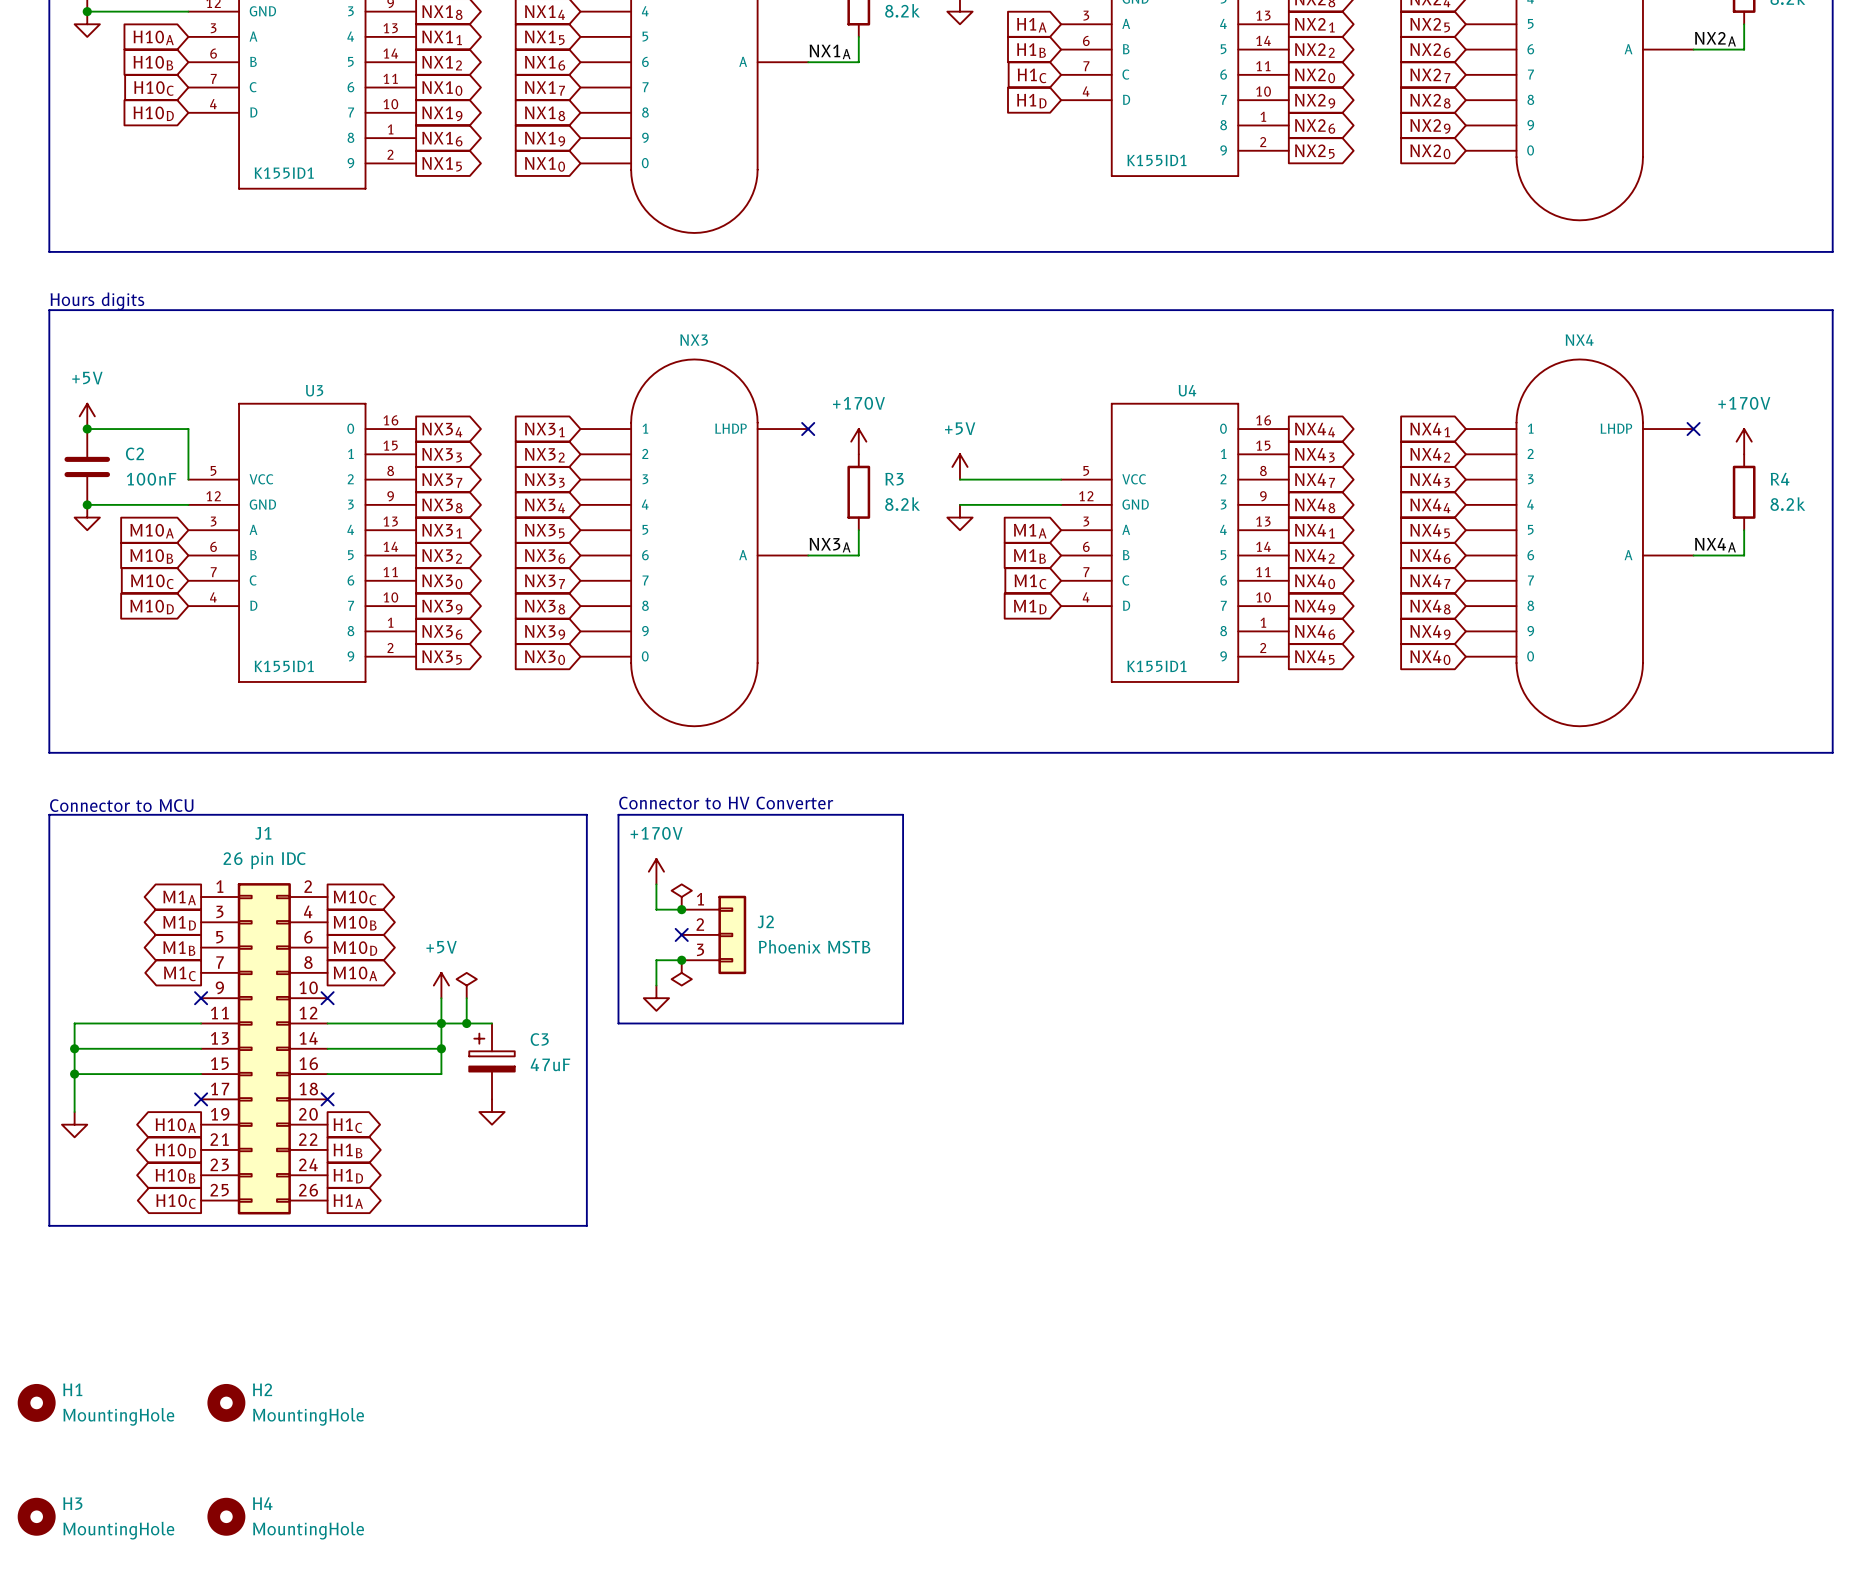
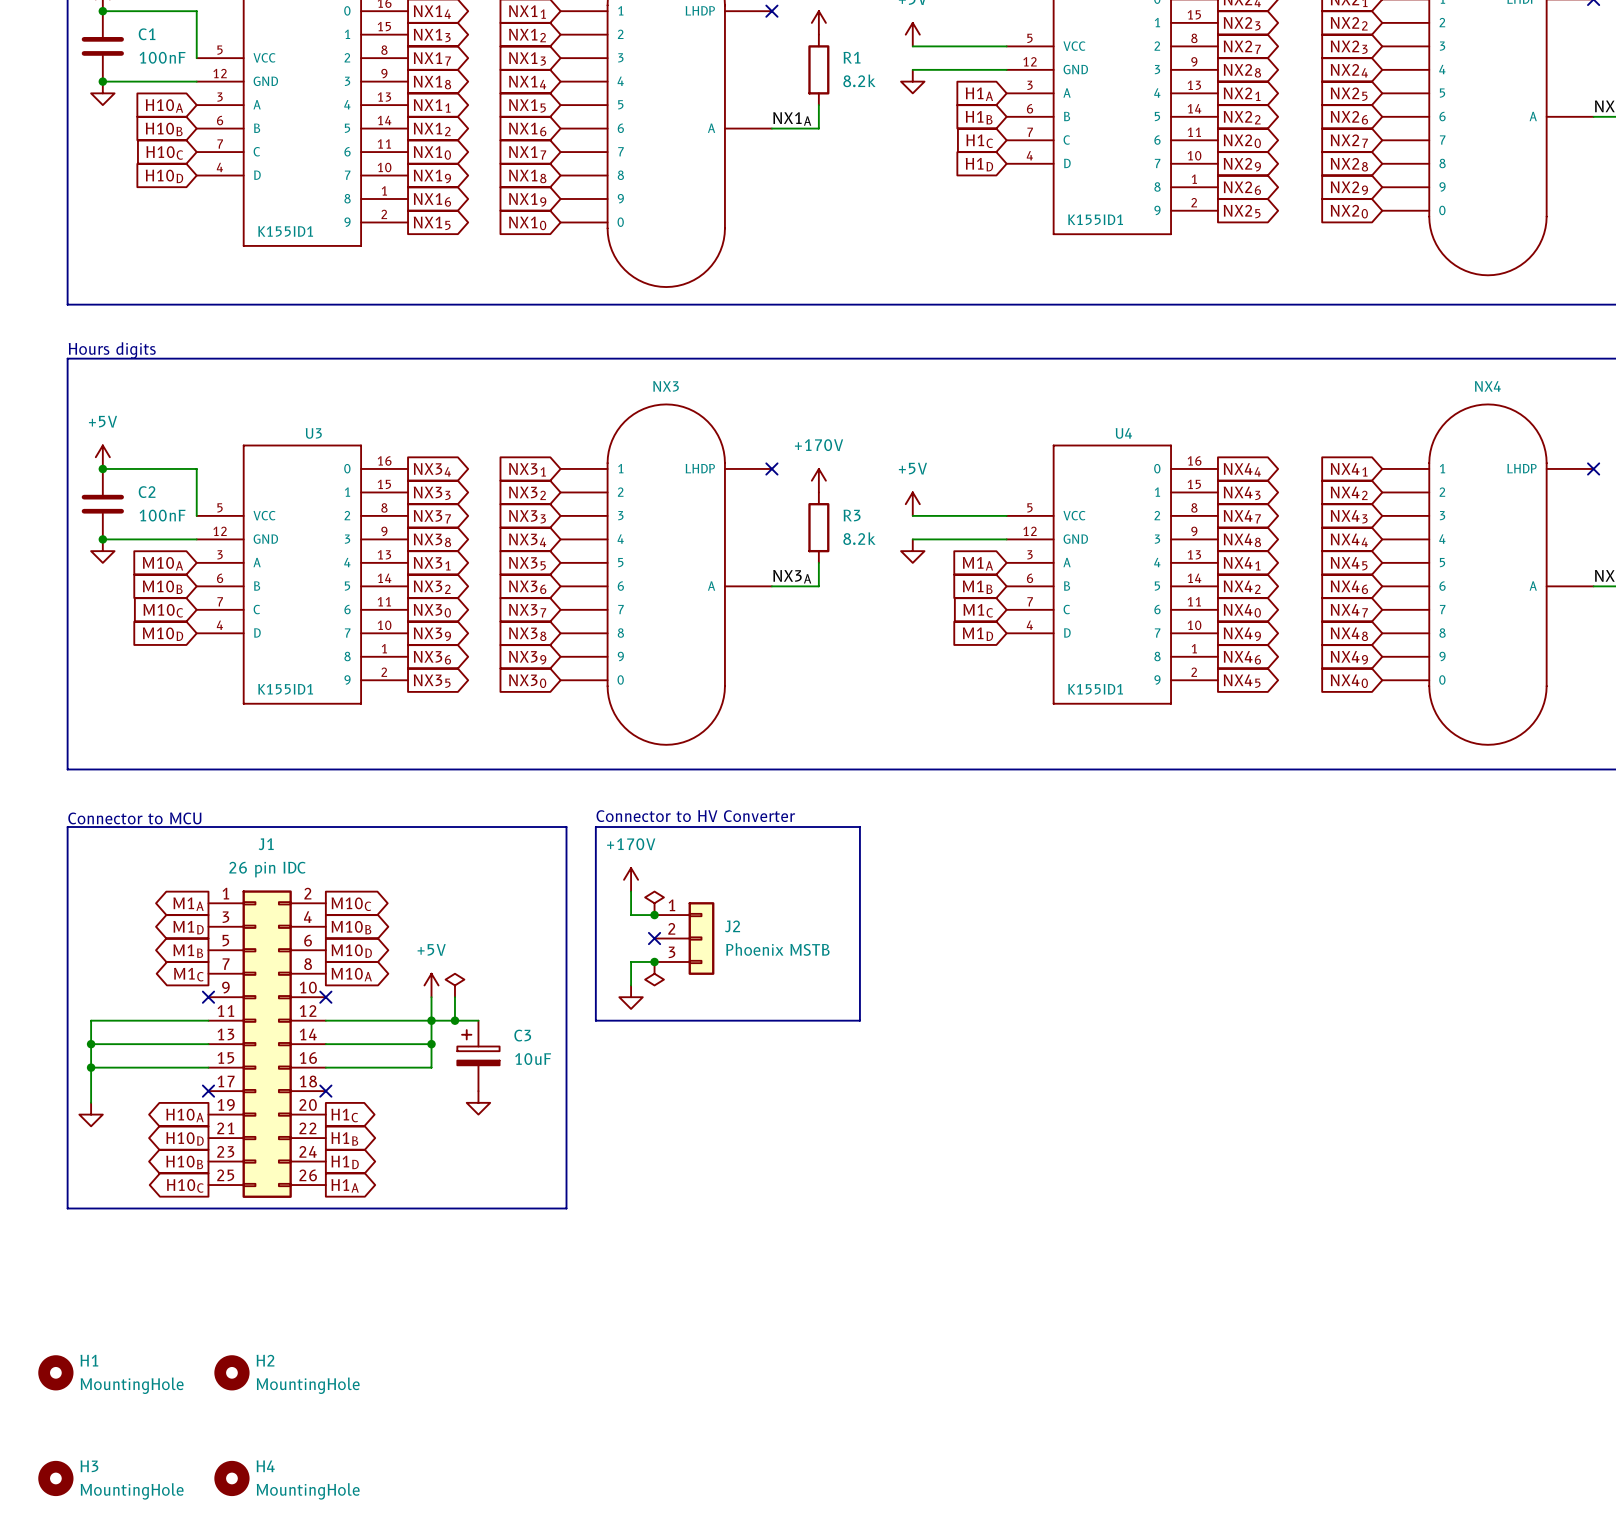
C3 value: 47uF (550, 1064) -> 10uF (533, 1059)

